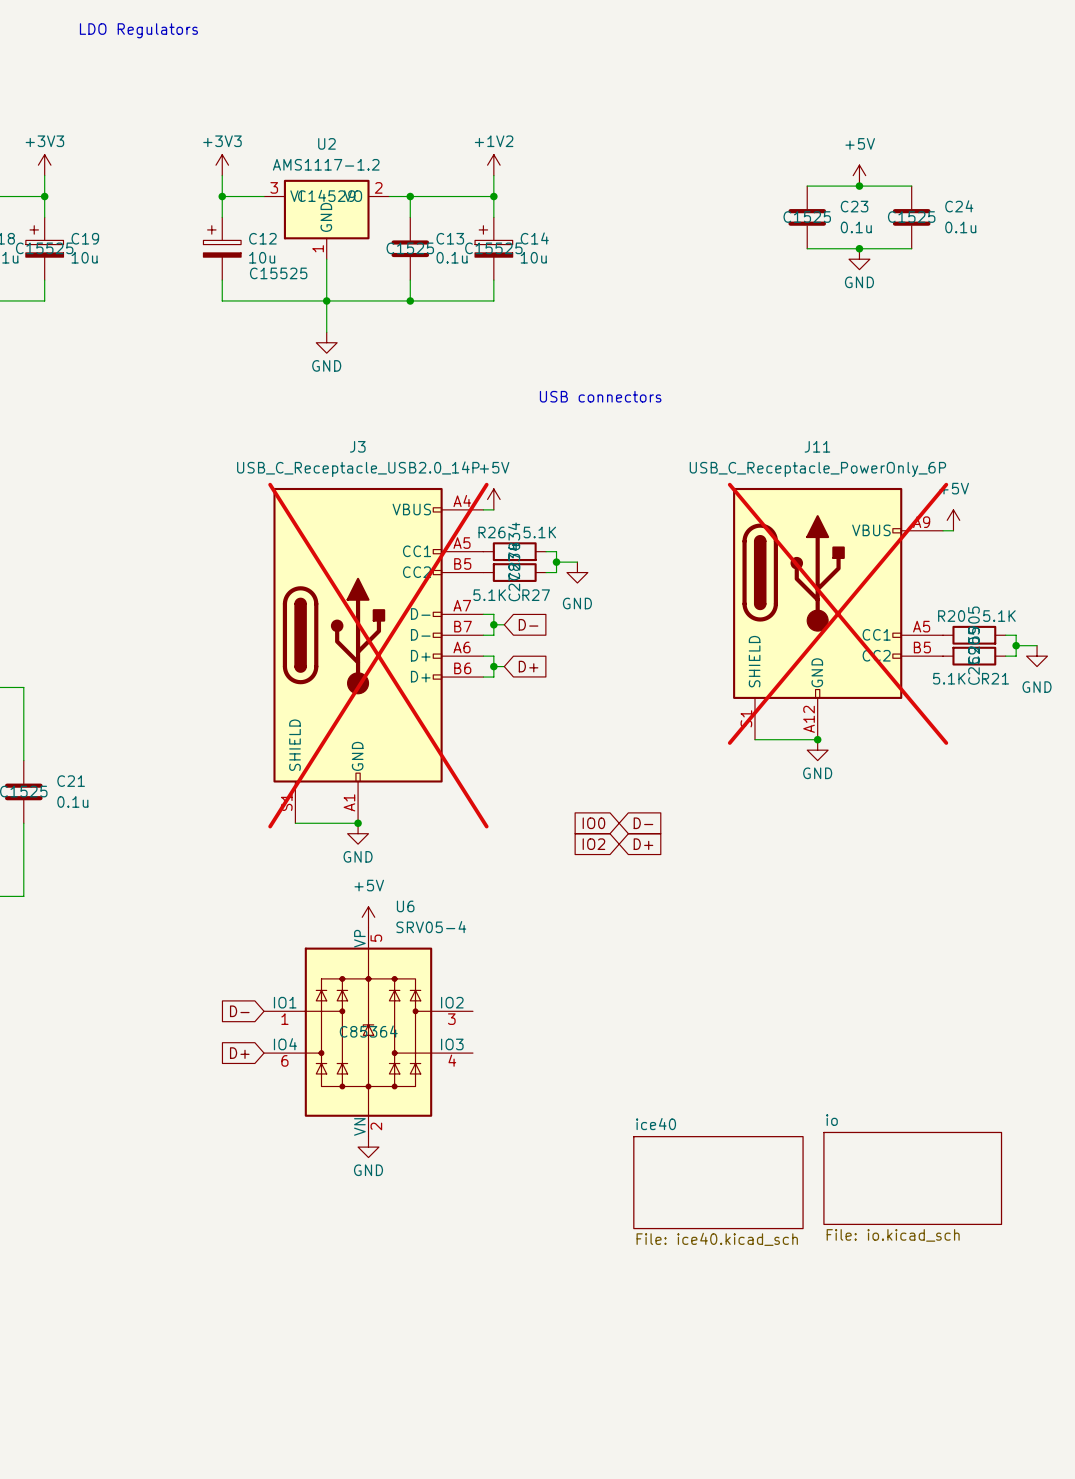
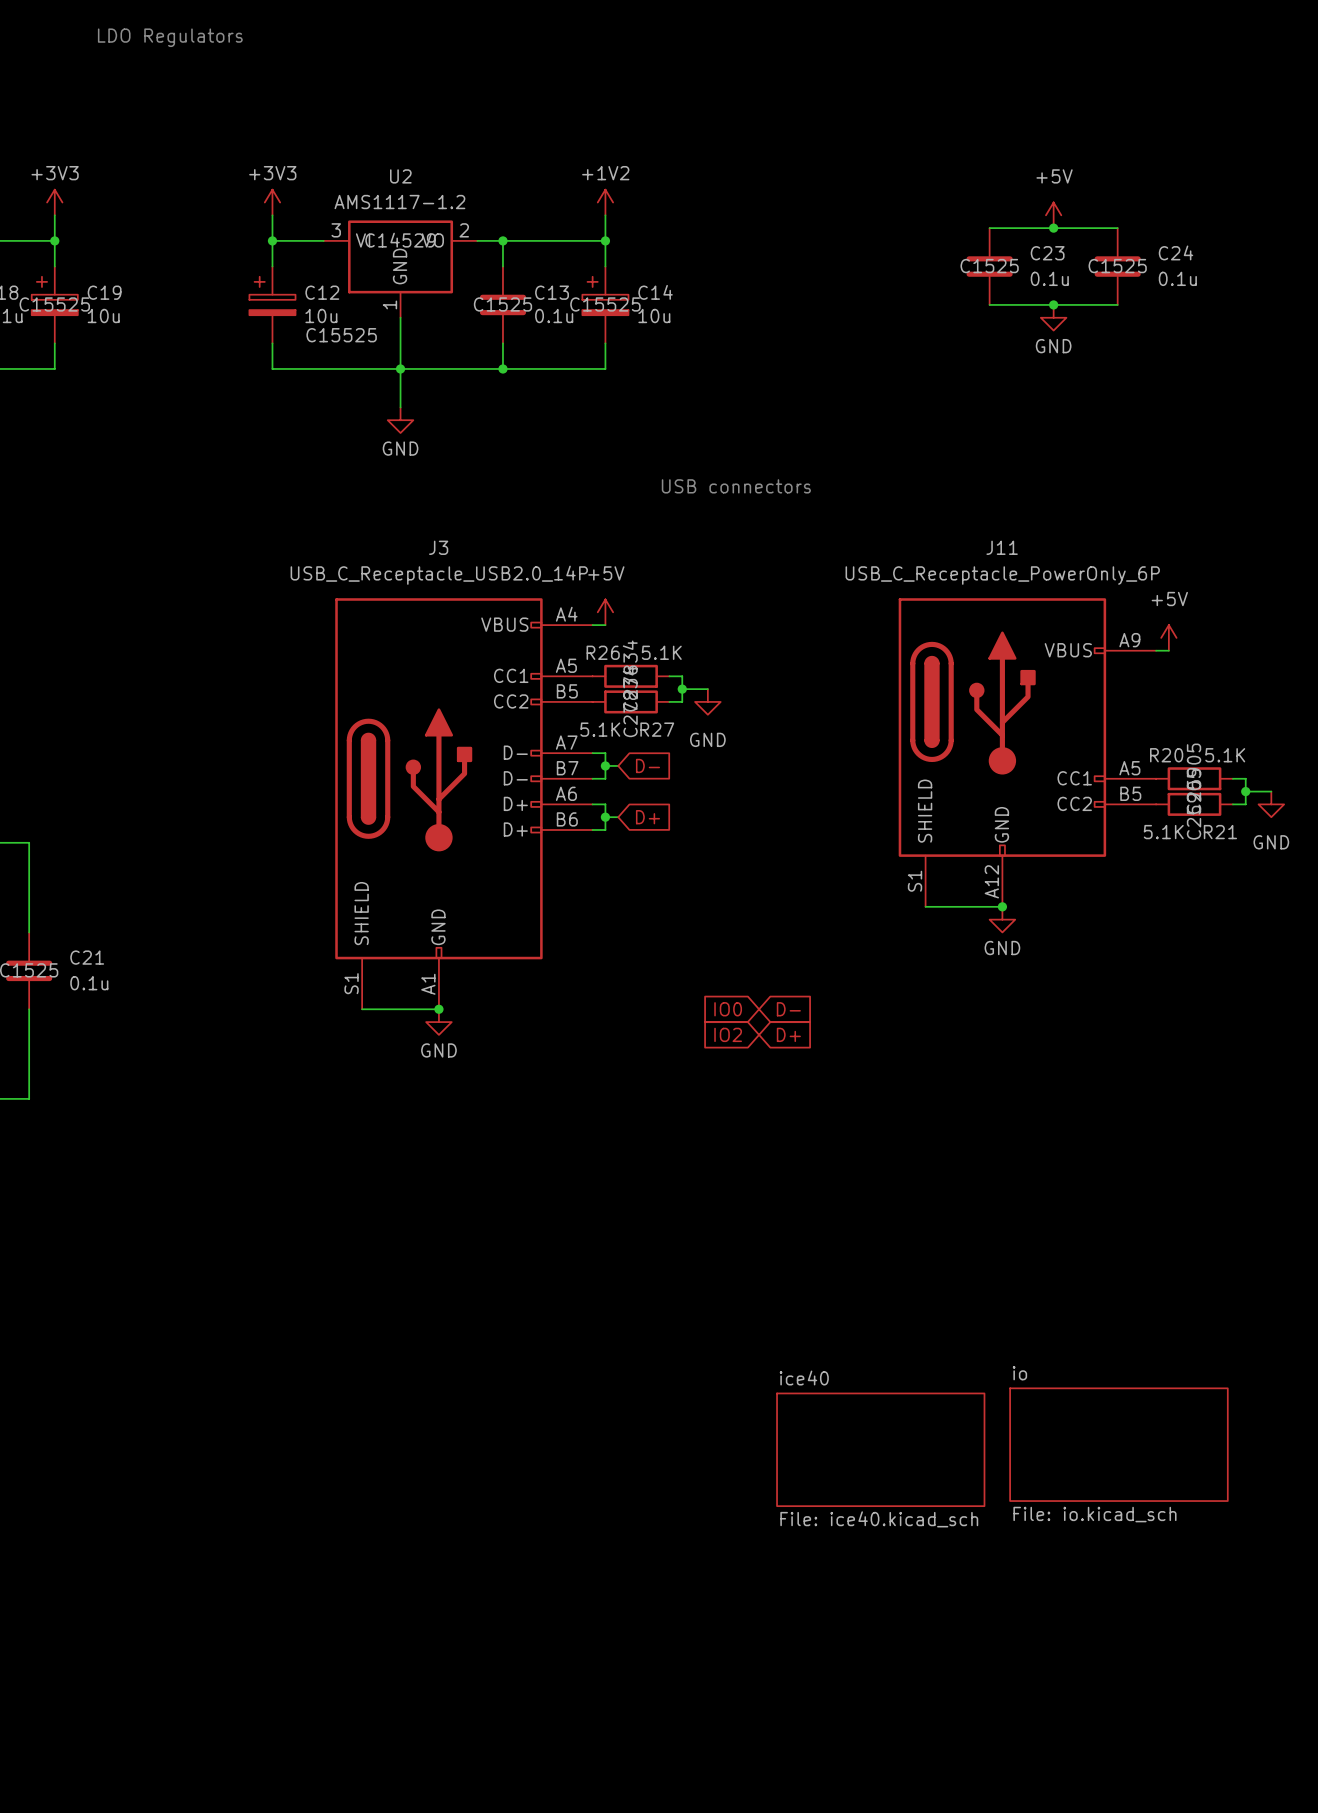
J11 do-not-place cross: (838, 613) -> none
J3 do-not-place cross: (378, 655) -> none
power symbol: +5V (368, 917) -> none
global label: D- (239, 1011) -> none
U6: SRV05-4 (368, 1032) -> none
global label: D+ (239, 1053) -> none
power symbol: GND (368, 1147) -> none

